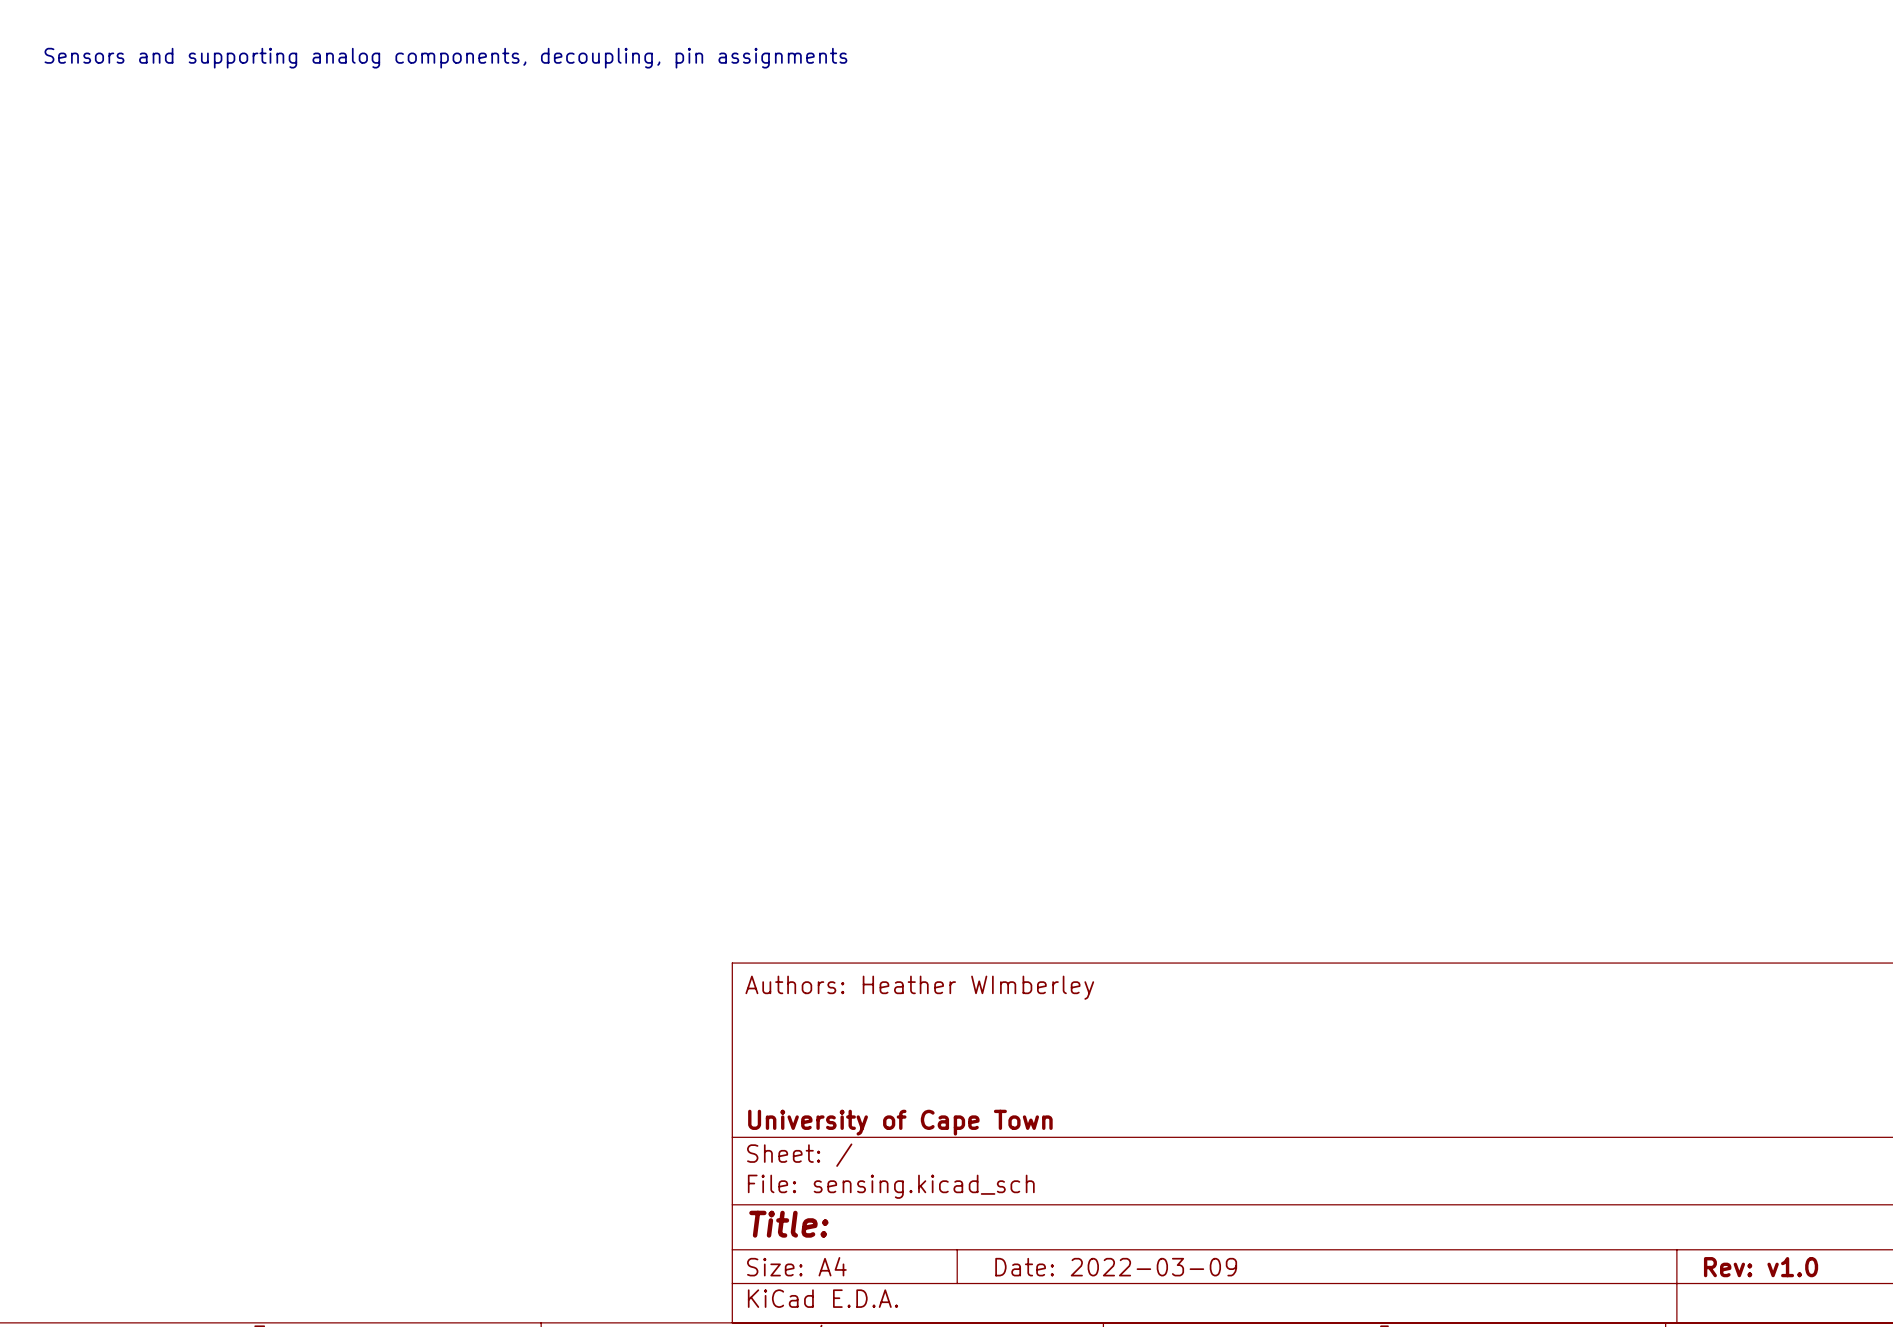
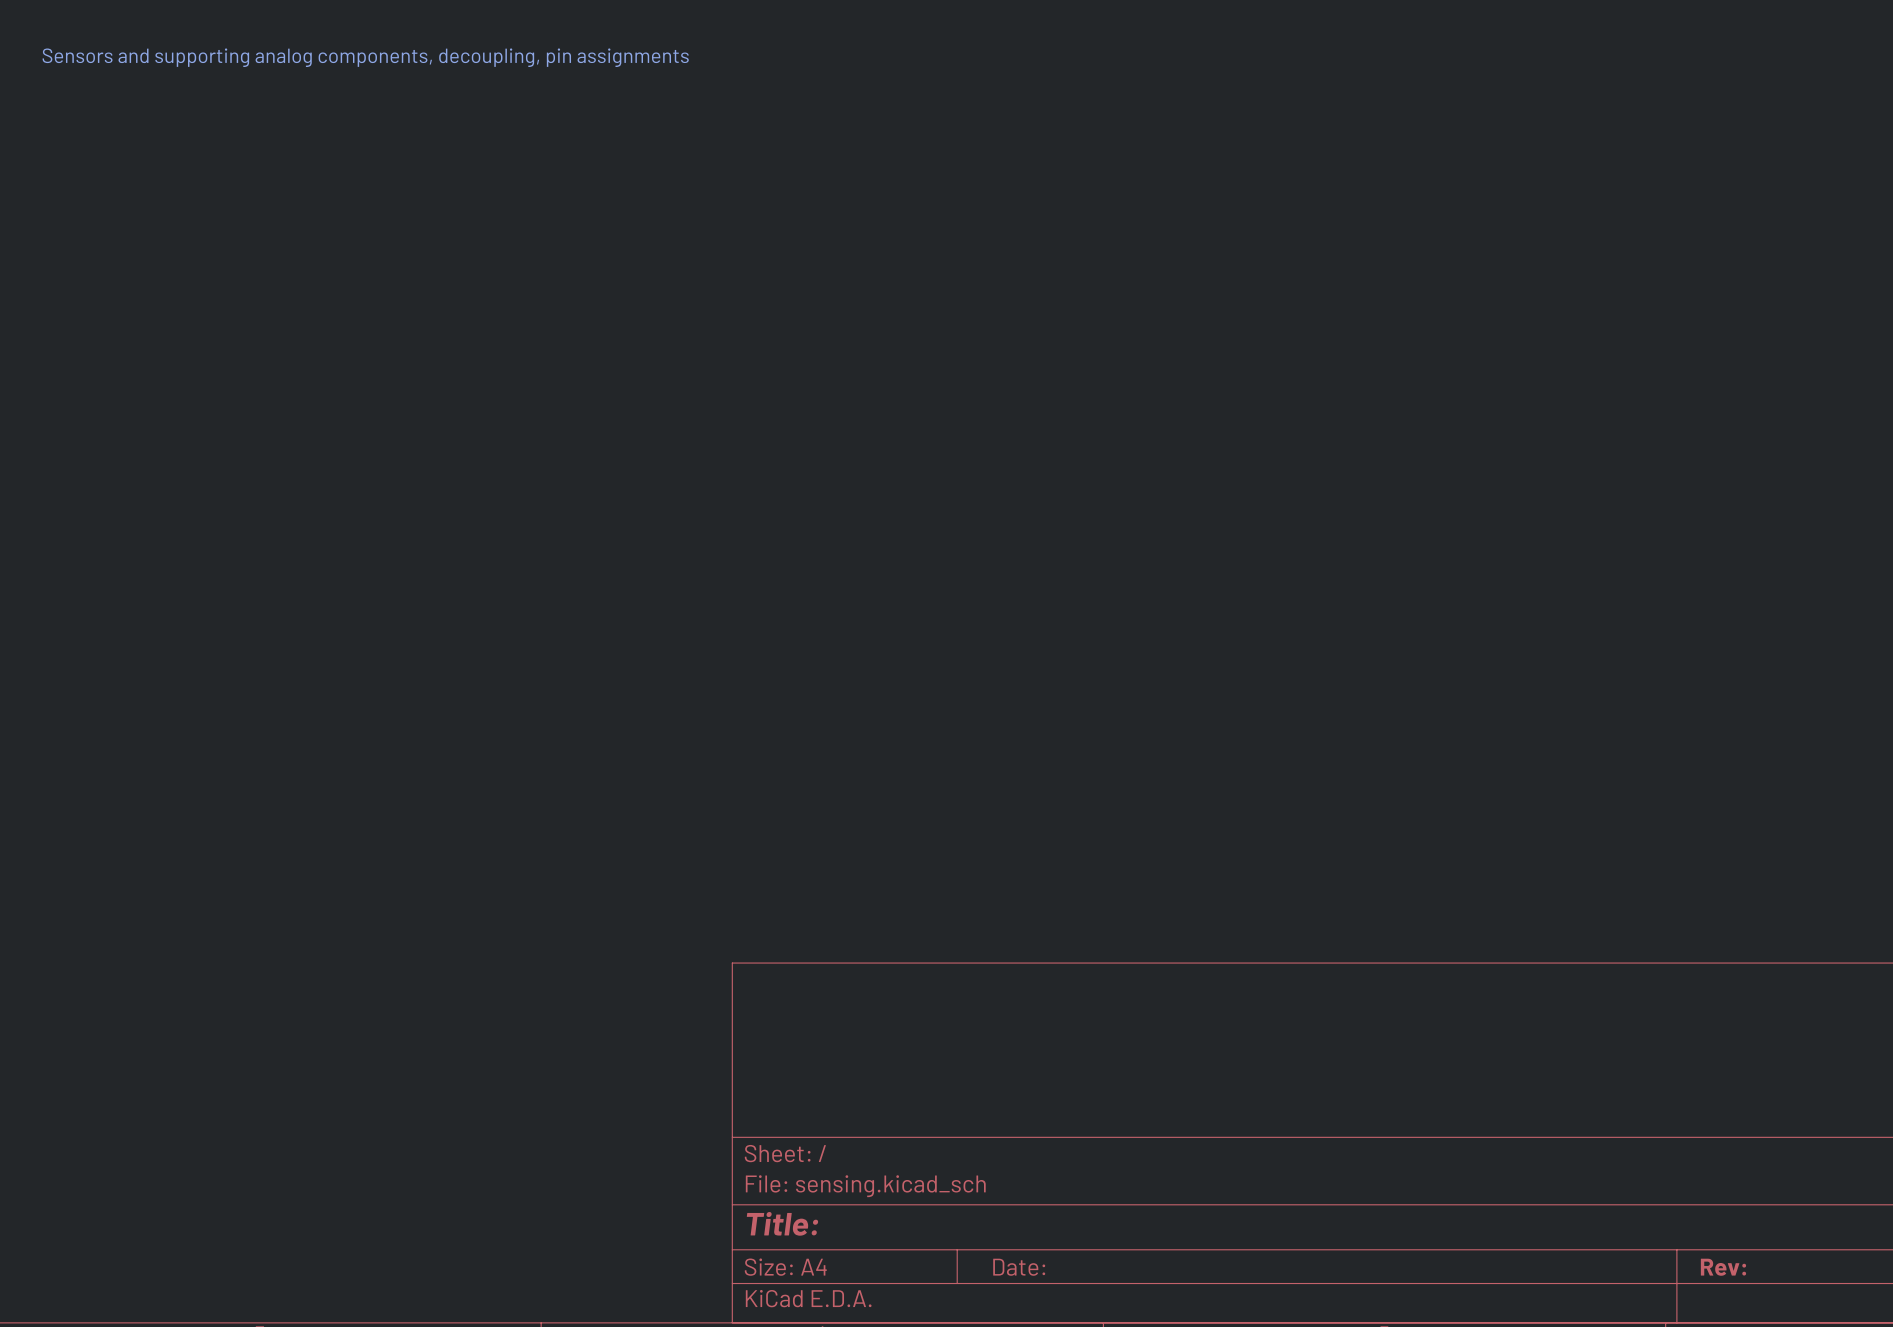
title block: Authors: Heather WImberley (919, 987) -> none
title block: University of Cape Town (900, 1122) -> none
title block: Date: 2022-03-09 (1116, 1267) -> Date: (1019, 1267)
title block: Rev: v1.0 (1761, 1267) -> Rev: (1723, 1267)

